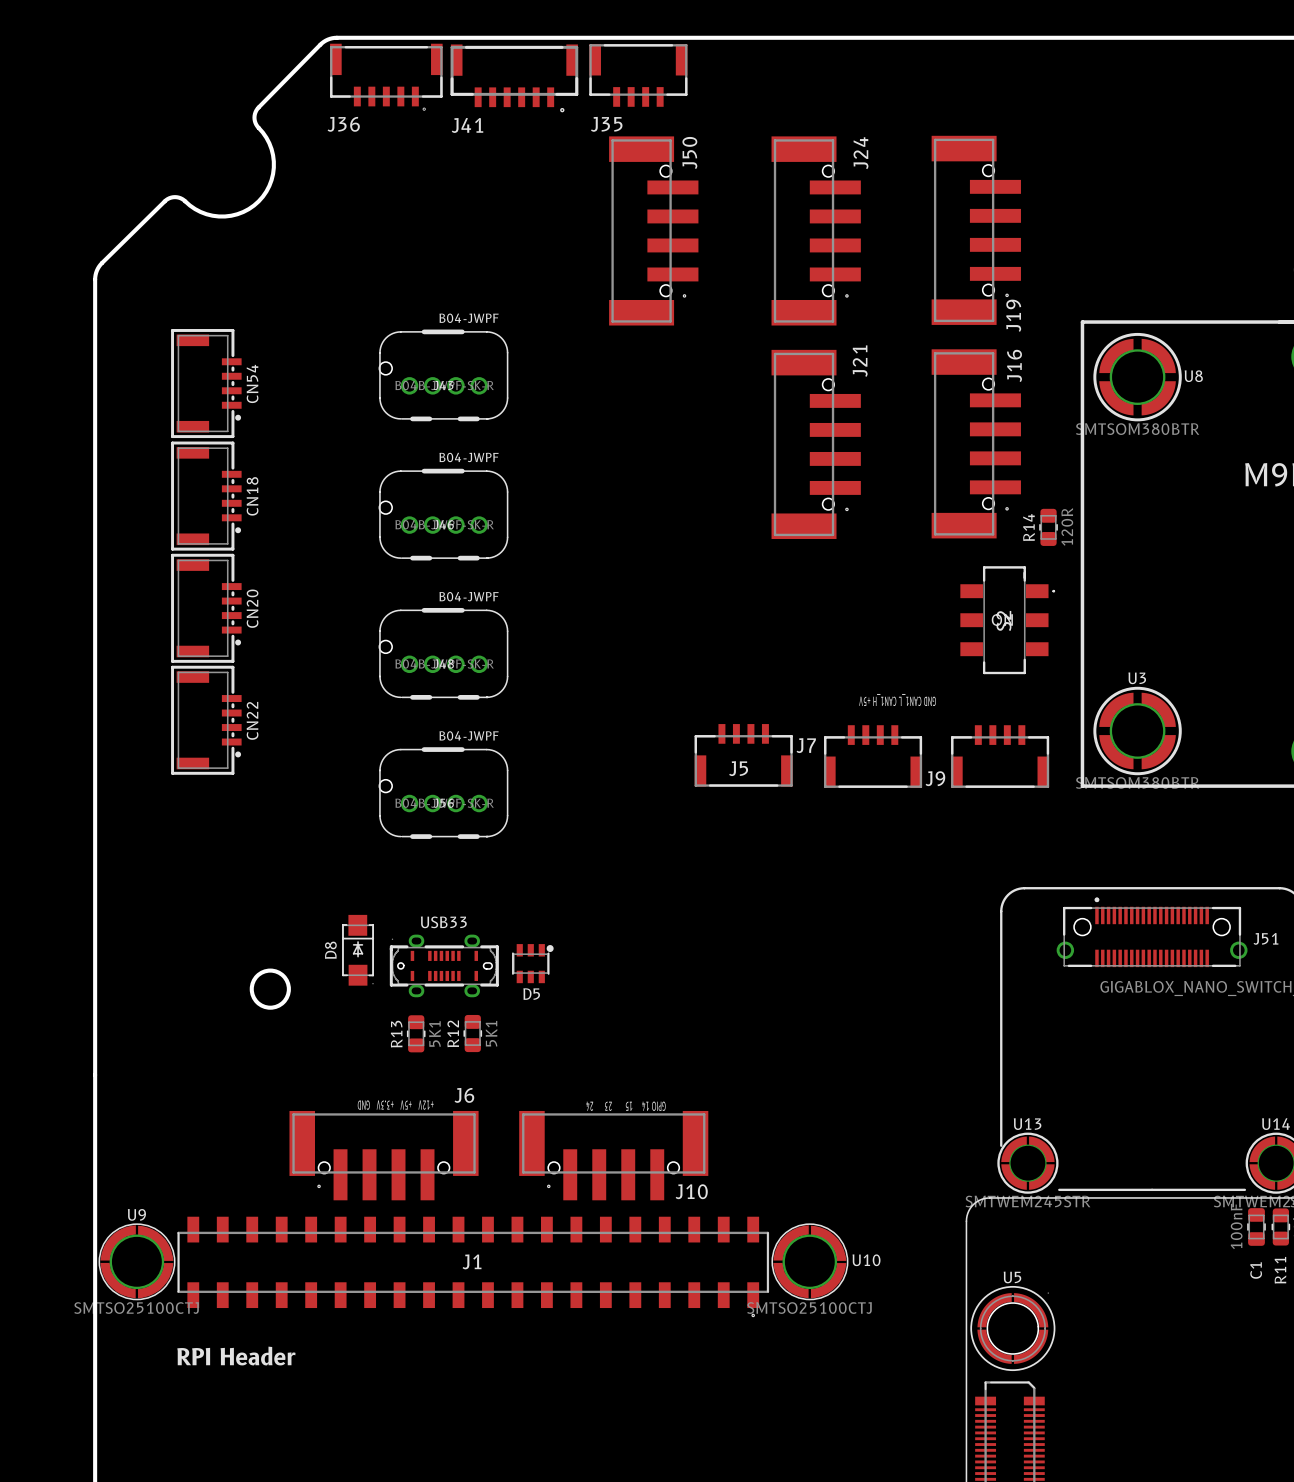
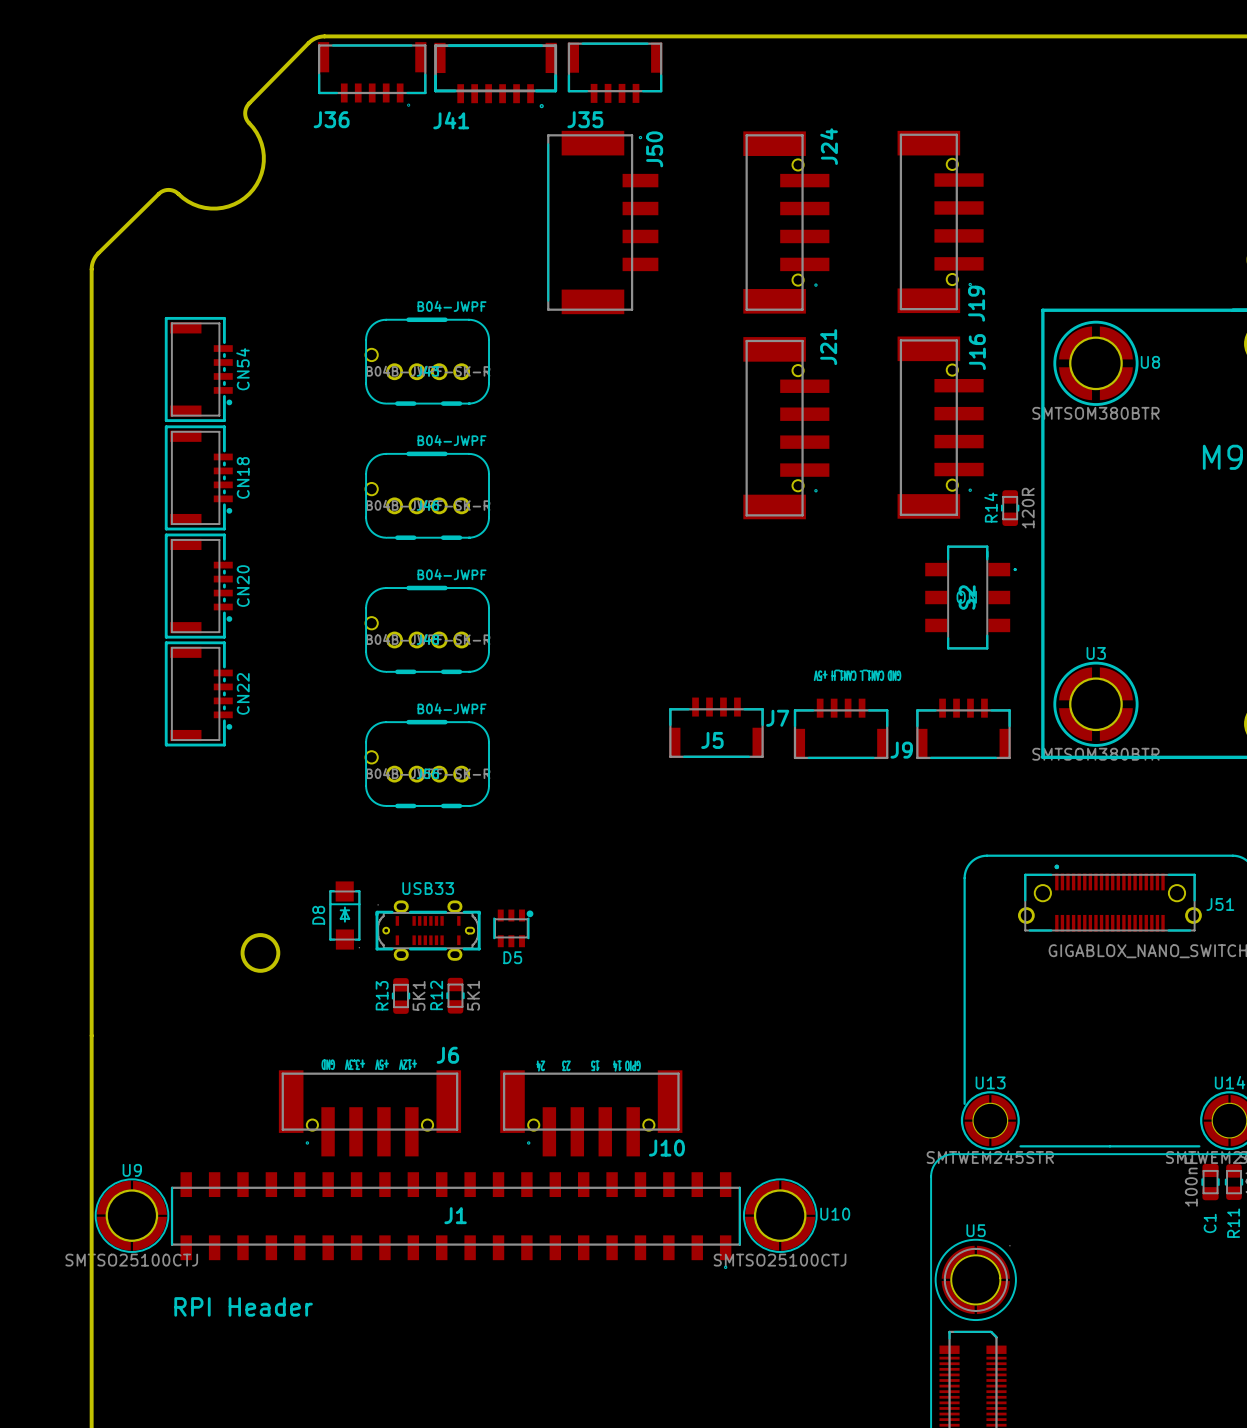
J50 footprint: [609, 136, 699, 326] -> [547, 130, 659, 315]

